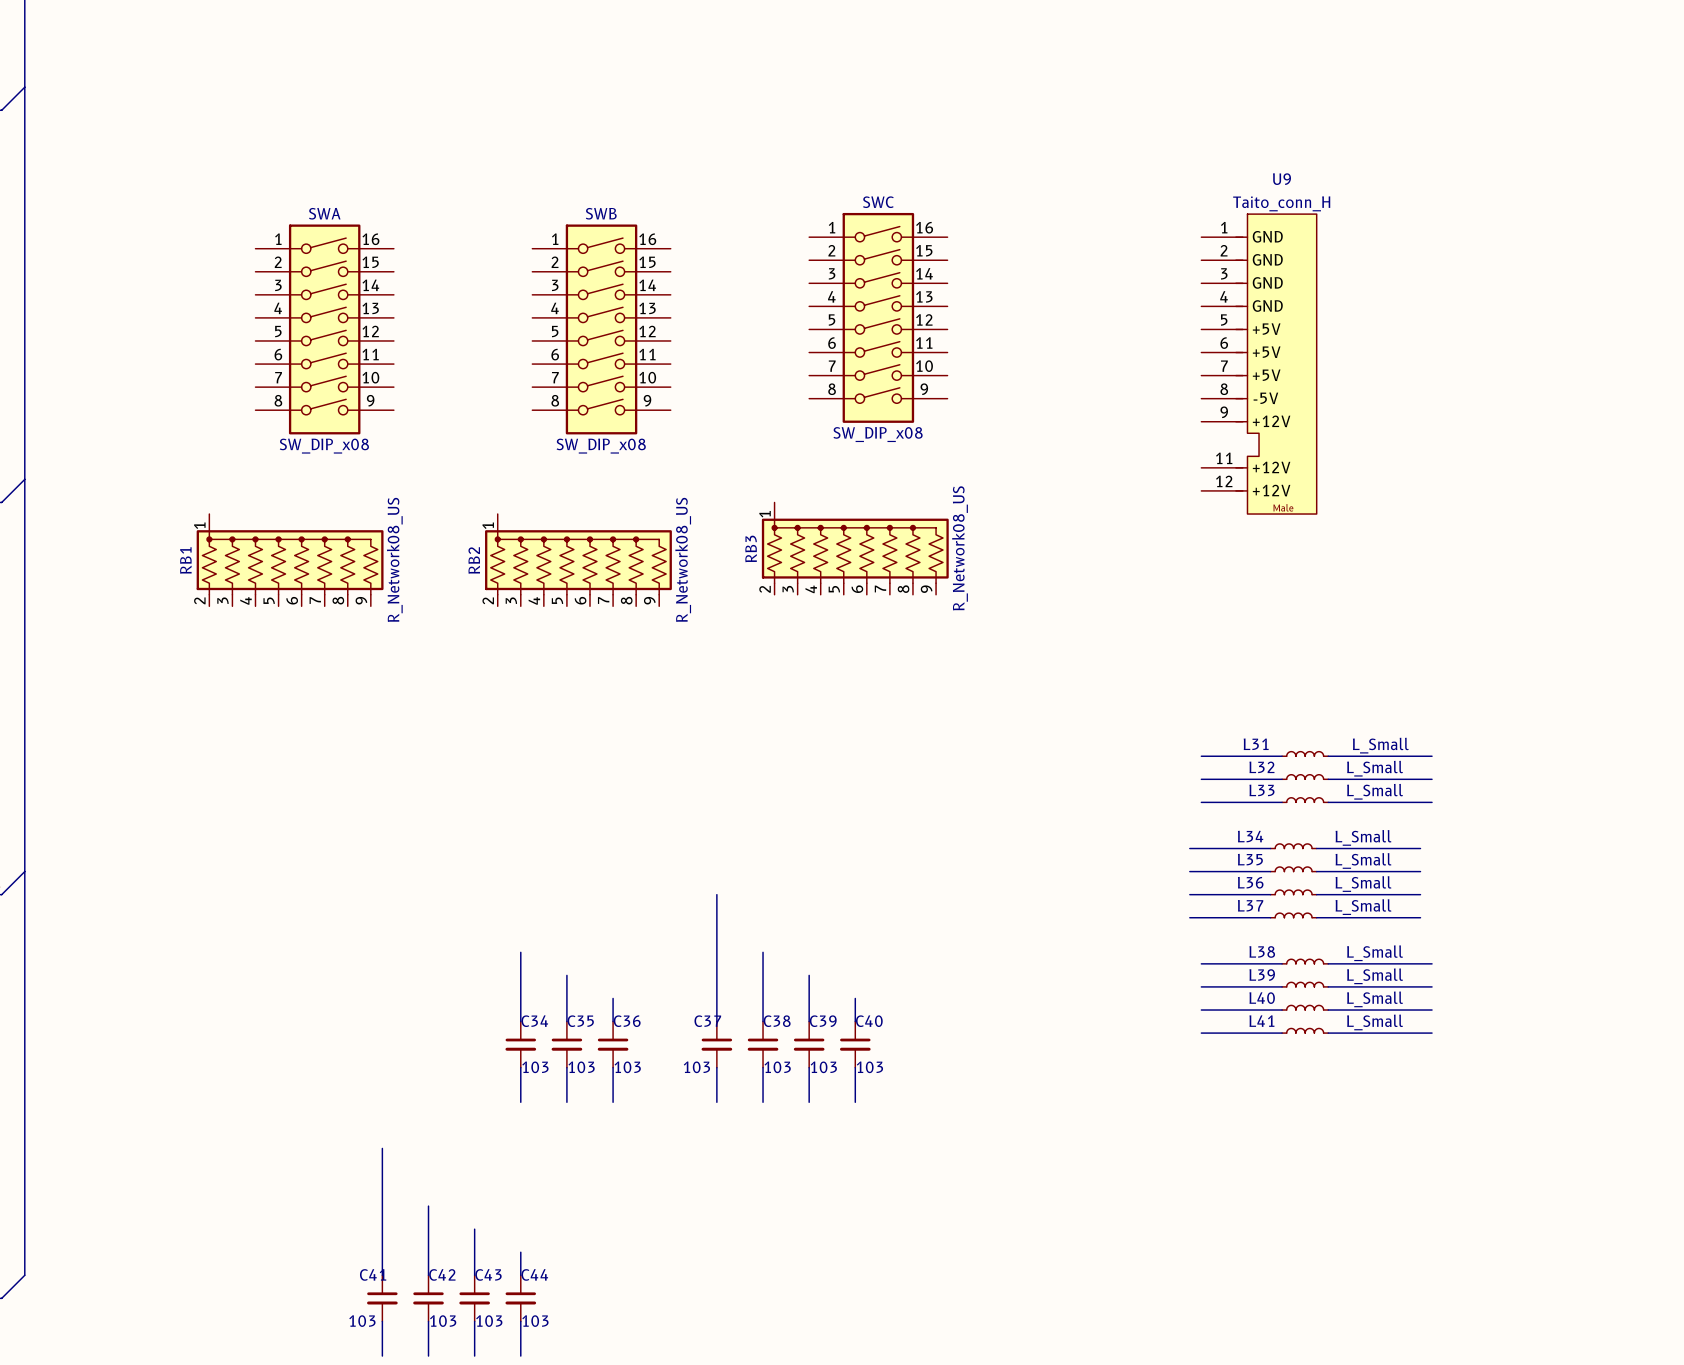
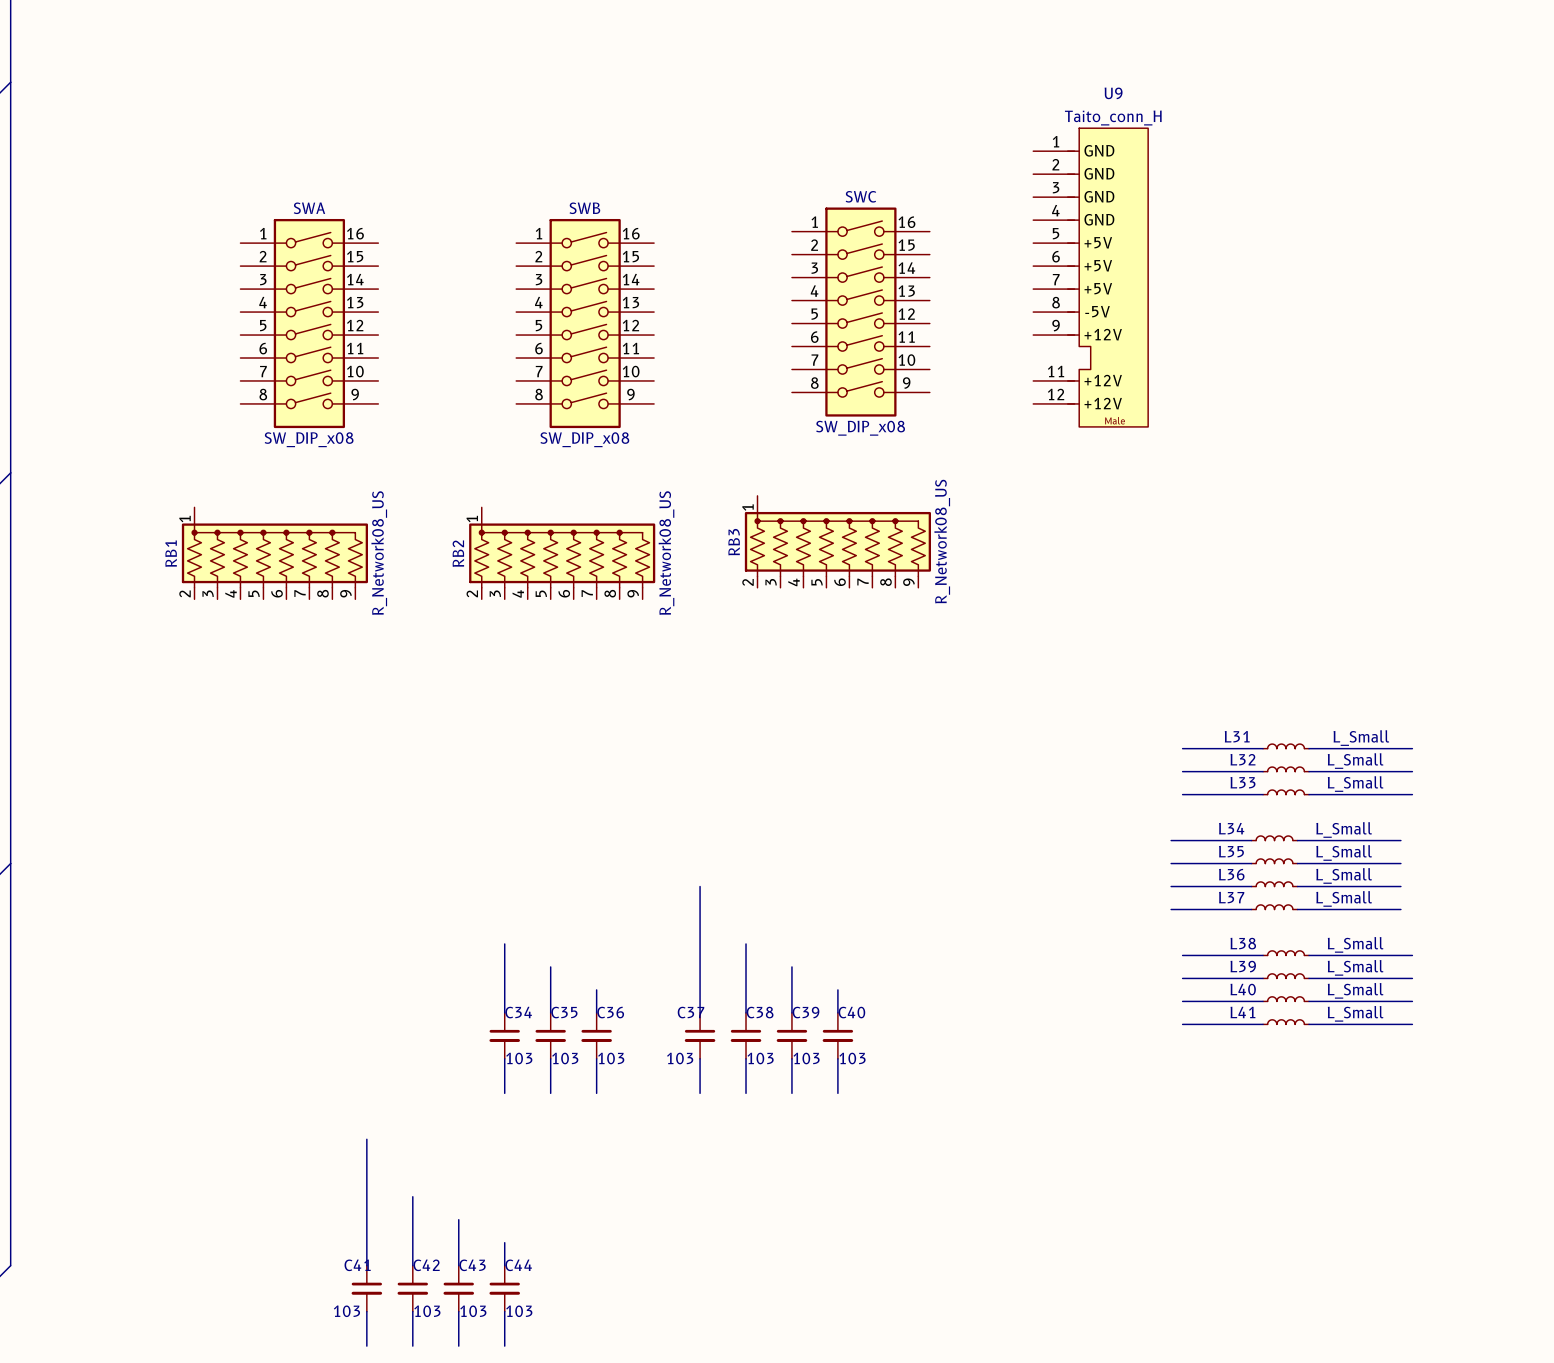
U9 position: (1259, 364) -> (1090, 277)

